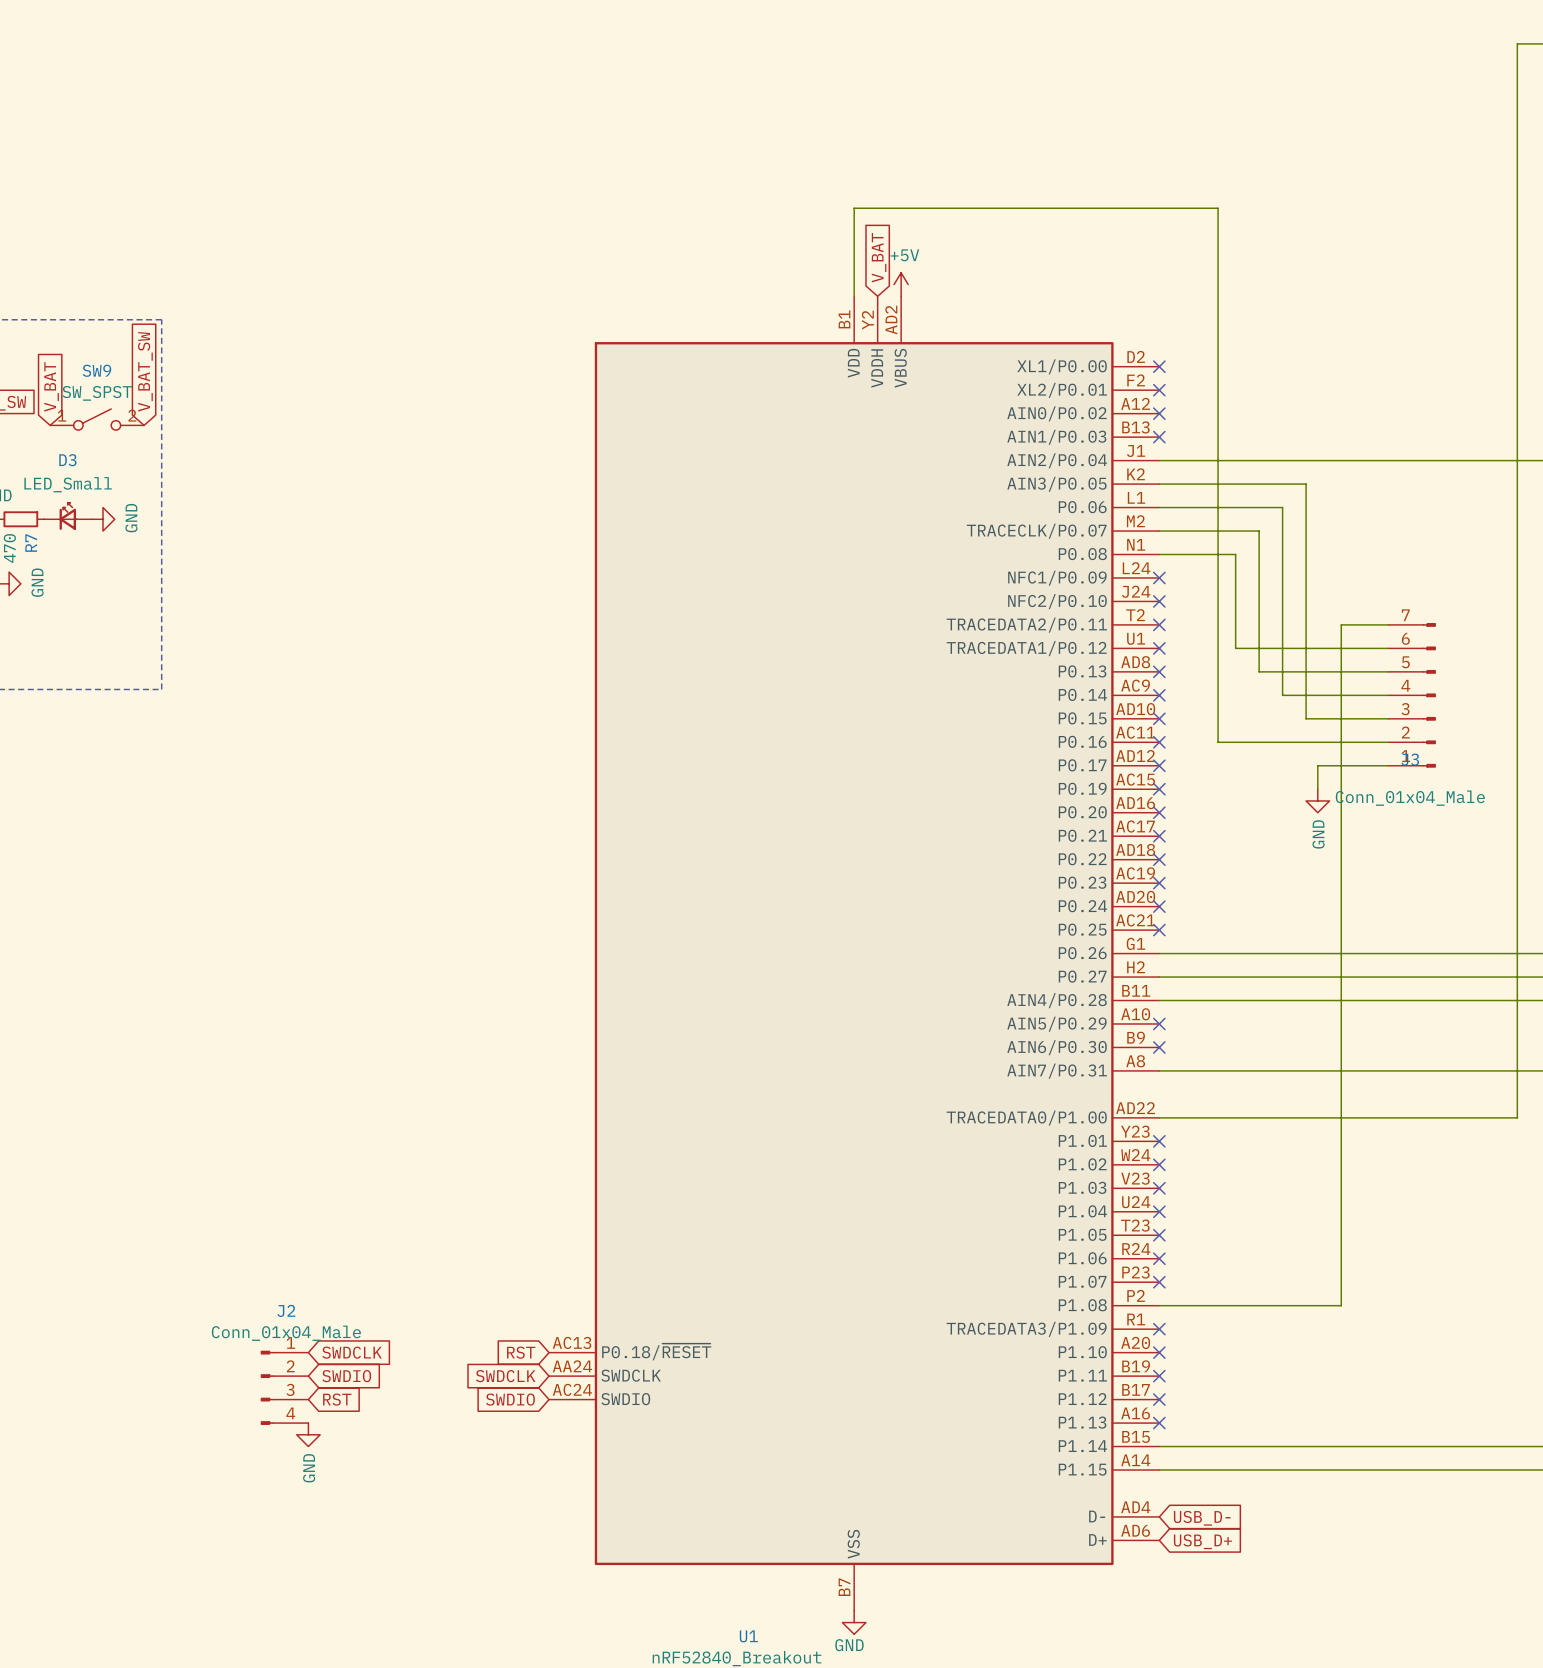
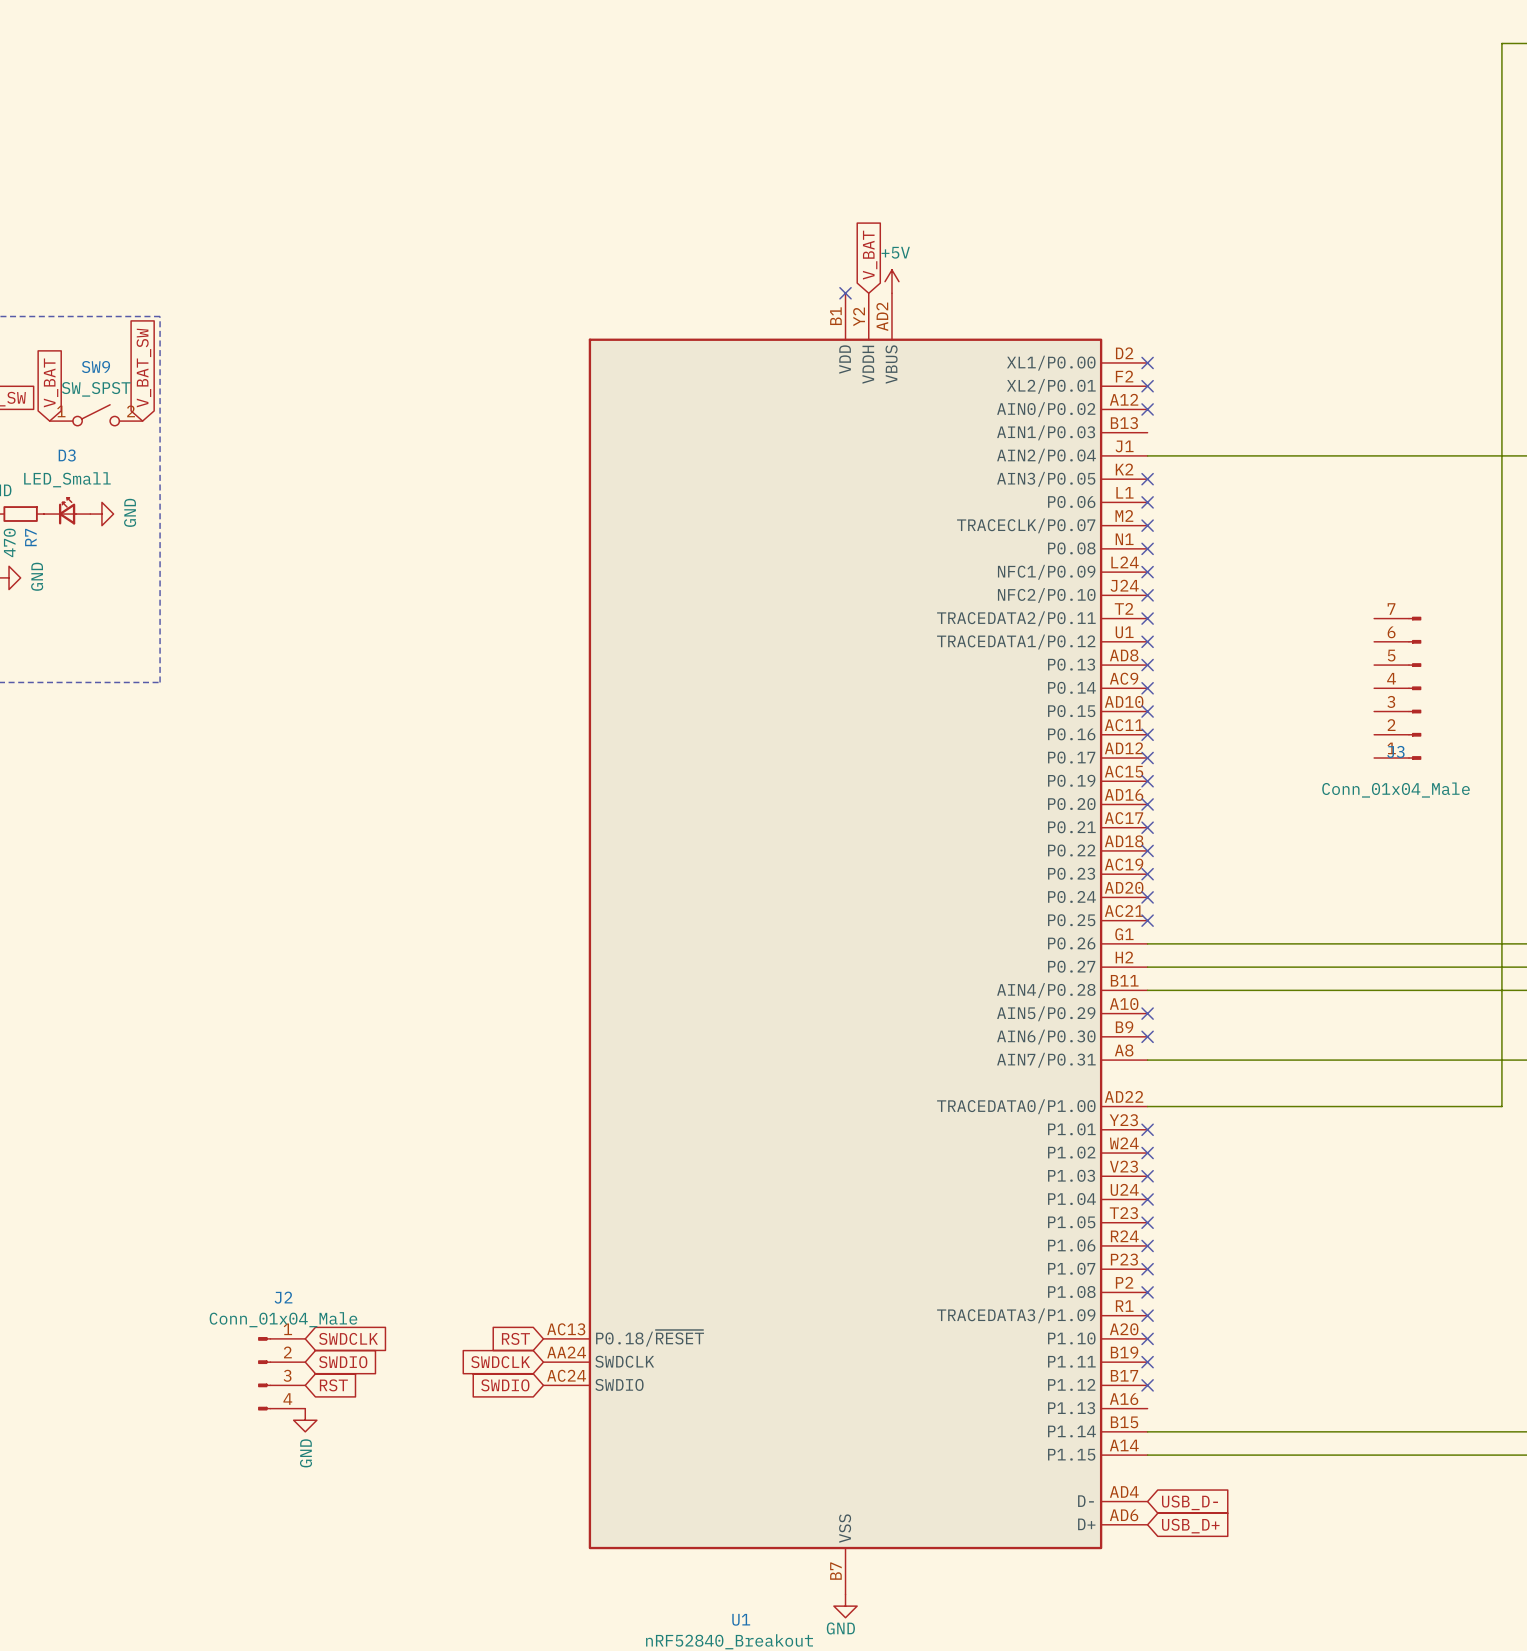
wire: (854, 296) (854, 208) (1218, 208) (1218, 742) (1388, 742) -> none
no-connect mark: none -> (845, 293)
no-connect mark: (1159, 437) -> none
wire: (1159, 484) (1306, 484) (1306, 718) (1388, 718) -> none
no-connect mark: none -> (1147, 479)
wire: (1159, 507) (1282, 507) (1282, 695) (1388, 695) -> none
no-connect mark: none -> (1147, 502)
wire: (1159, 531) (1259, 531) (1259, 671) (1388, 671) -> none
no-connect mark: none -> (1147, 525)
wire: (1159, 554) (1235, 554) (1235, 648) (1388, 648) -> none
no-connect mark: none -> (1147, 548)
wire: (1388, 624) (1341, 624) (1341, 1305) (1159, 1305) -> none
wire: (1388, 765) (1317, 765) (1317, 789) -> none
power symbol: GND (1317, 800) -> none
no-connect mark: none -> (1147, 1292)
no-connect mark: (1159, 1423) -> none

